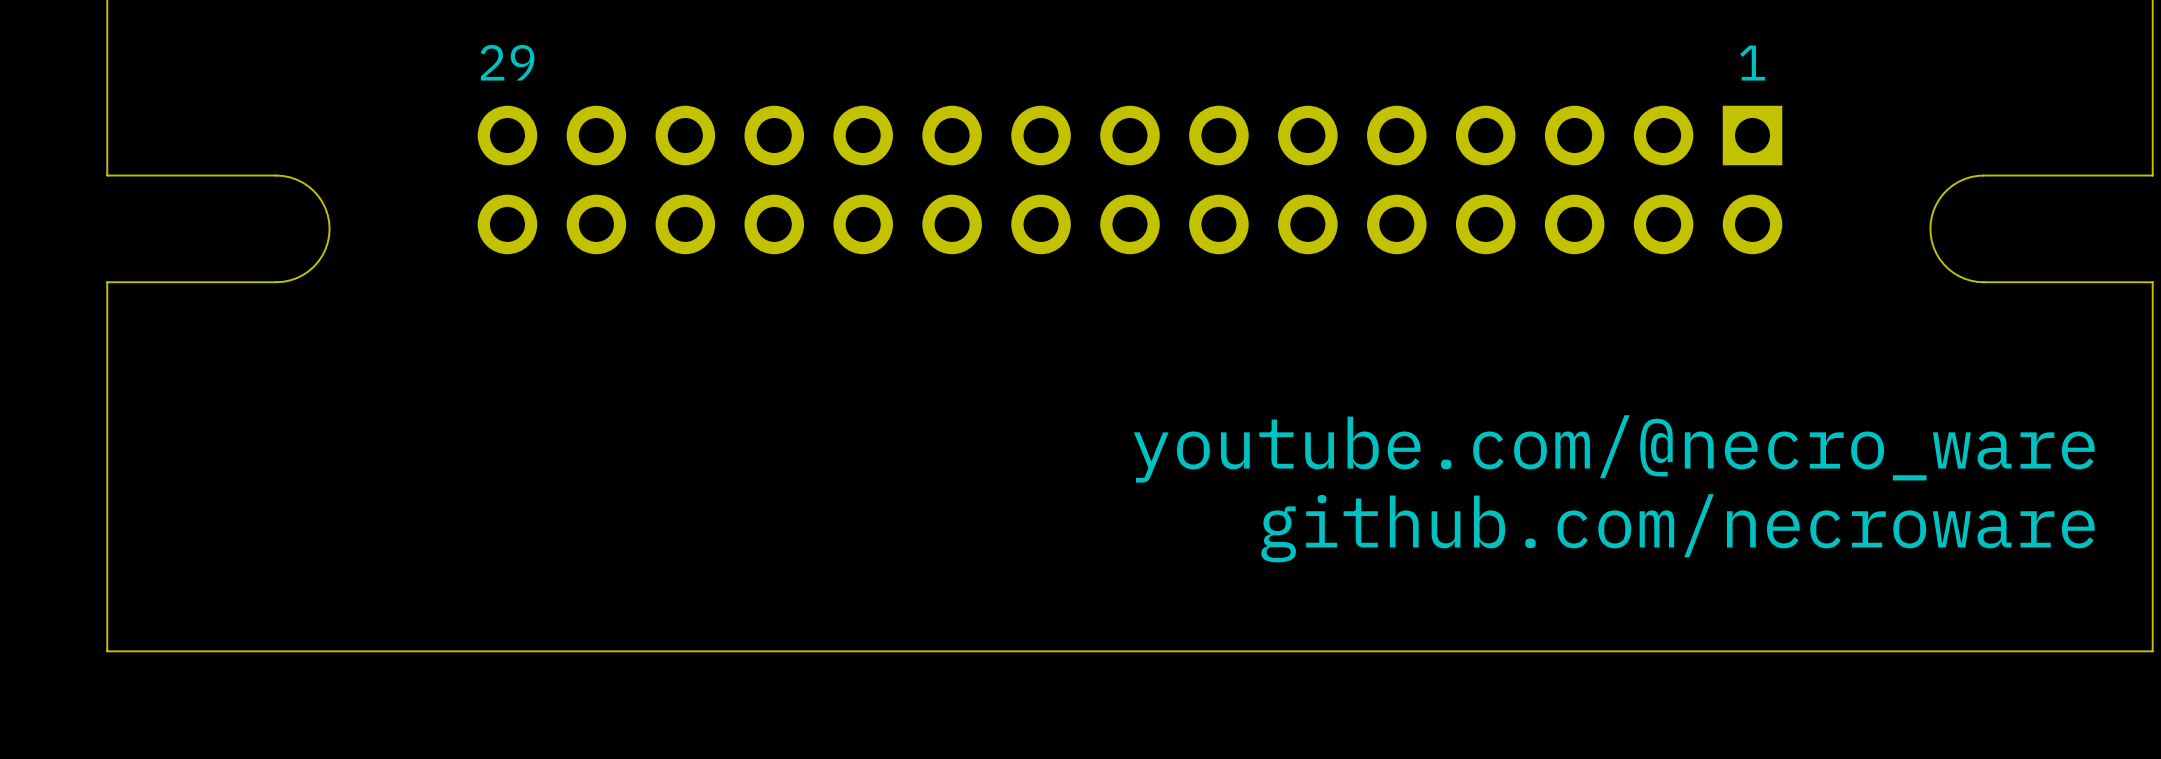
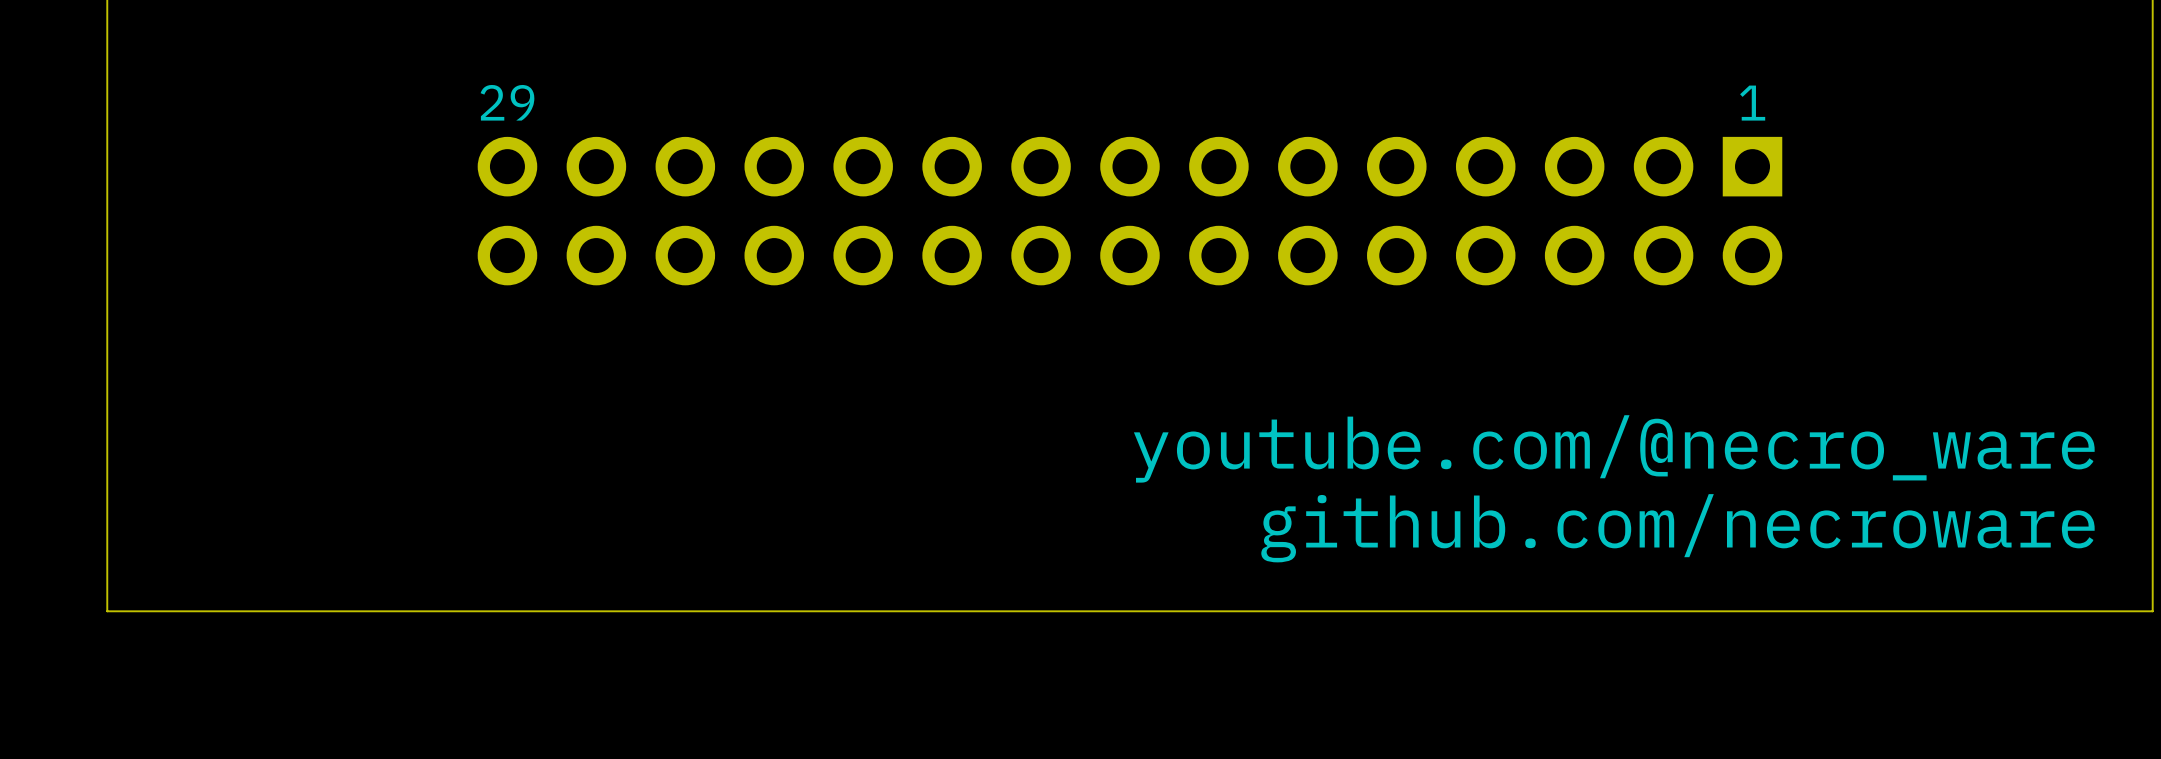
text position: 29 (507, 62) -> 29 (507, 102)
text position: 1 (1752, 63) -> 1 (1752, 103)
board edge: (107, 175) (276, 175) (290, 177) (302, 182) (318, 196) (327, 215) (329, 228) (327, 242) (318, 261) (302, 275) (290, 280) (276, 282) (107, 282) -> (107, 175) (107, 282)
board edge: (2152, 175) (1970, 177) (1958, 181) (1943, 193) (1933, 209) (1930, 228) (1933, 247) (1943, 264) (1958, 276) (1970, 280) (2152, 282) -> (2152, 175) (2152, 282)
part position: (1129, 179) -> (1129, 211)
board edge: (2152, 611) (2152, 651) (107, 651) (107, 611) -> (2152, 611) (107, 611)

